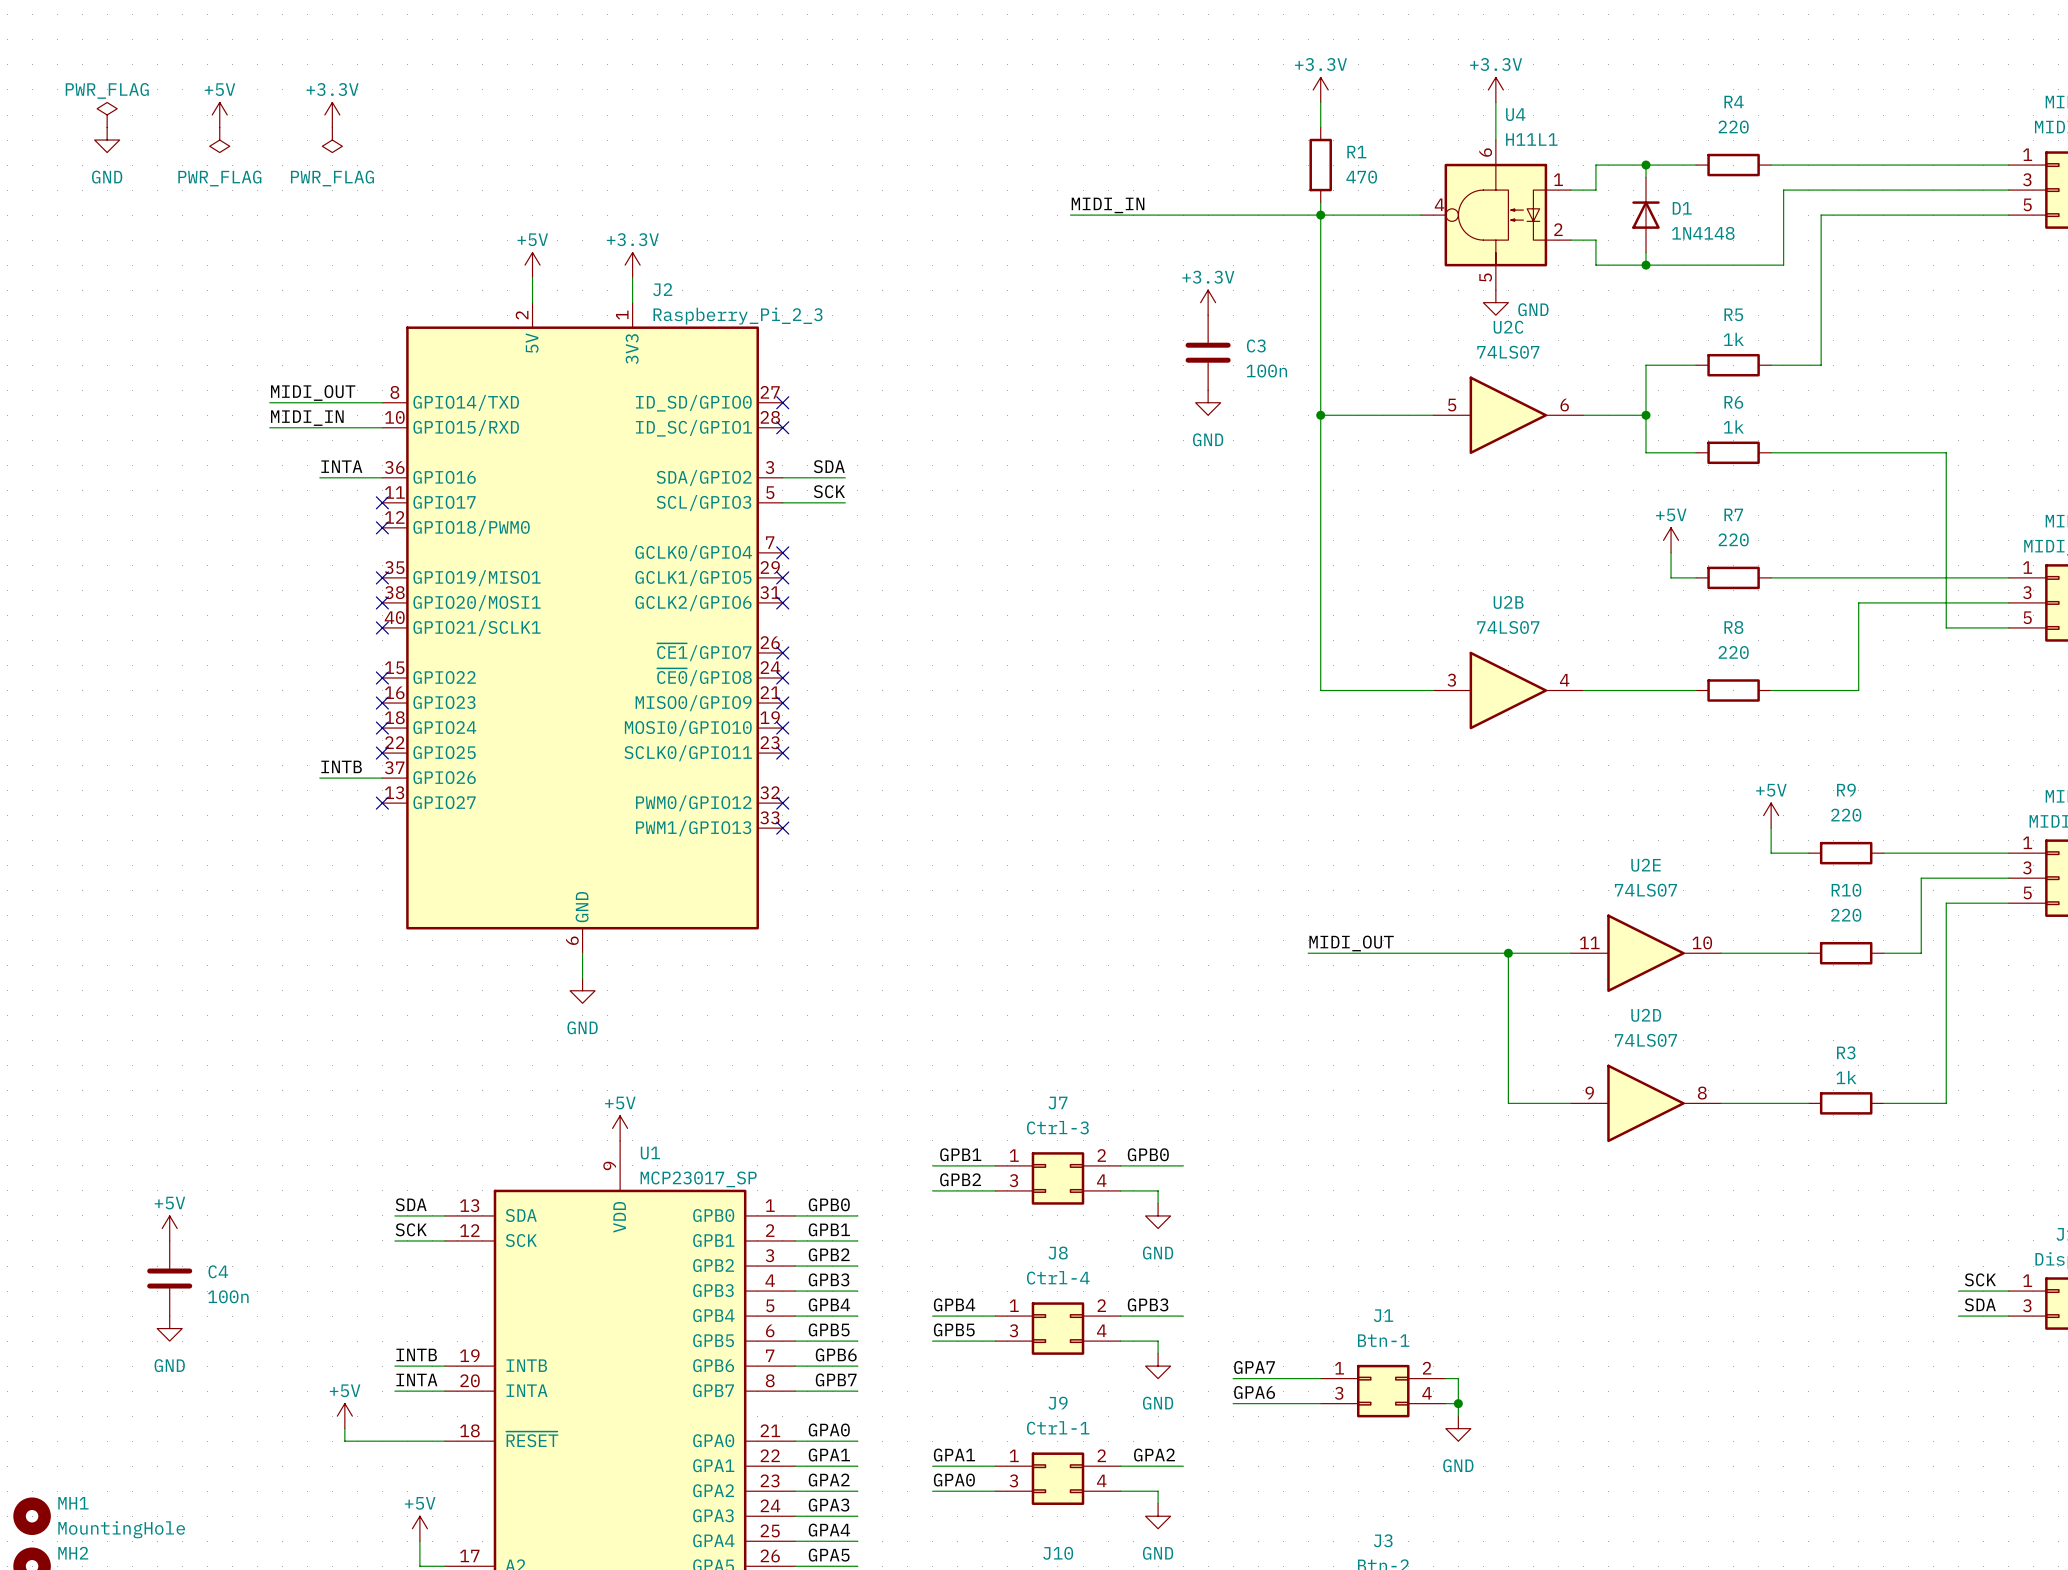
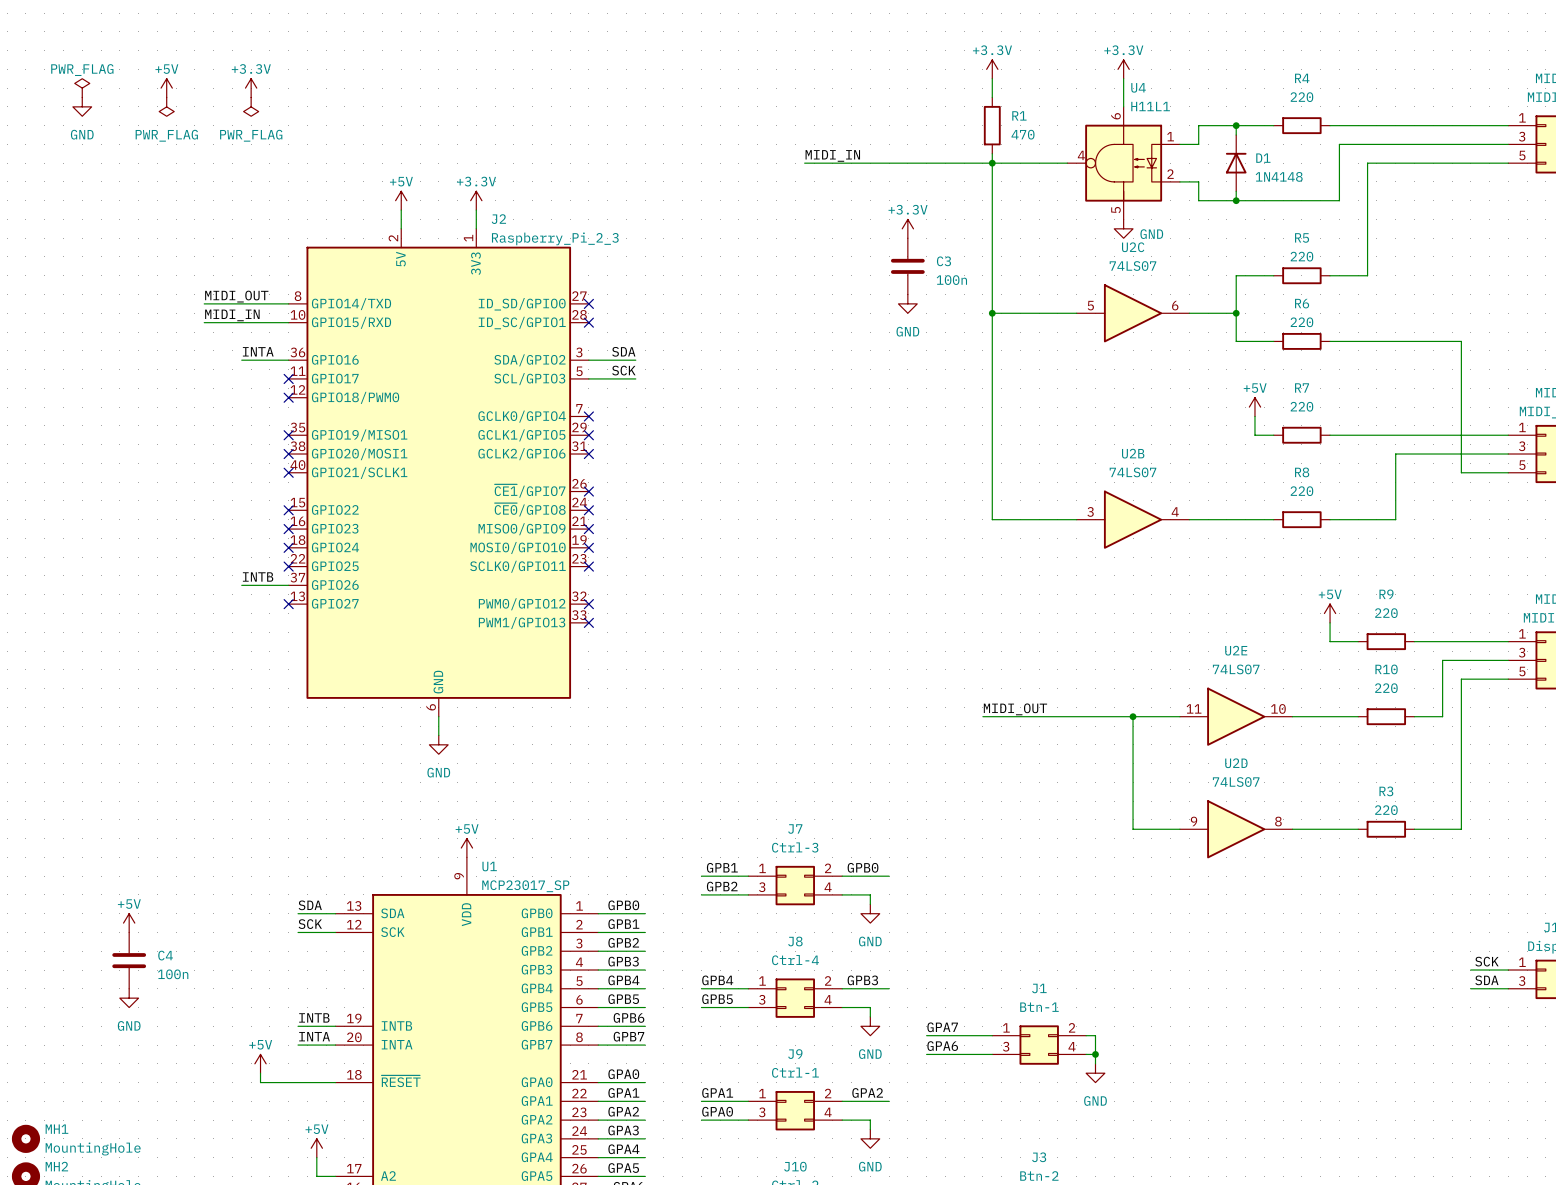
R5 value: 1k (1733, 339) -> 220 (1301, 256)
R6 value: 1k (1733, 426) -> 220 (1301, 322)
R3 value: 1k (1846, 1077) -> 220 (1386, 810)

